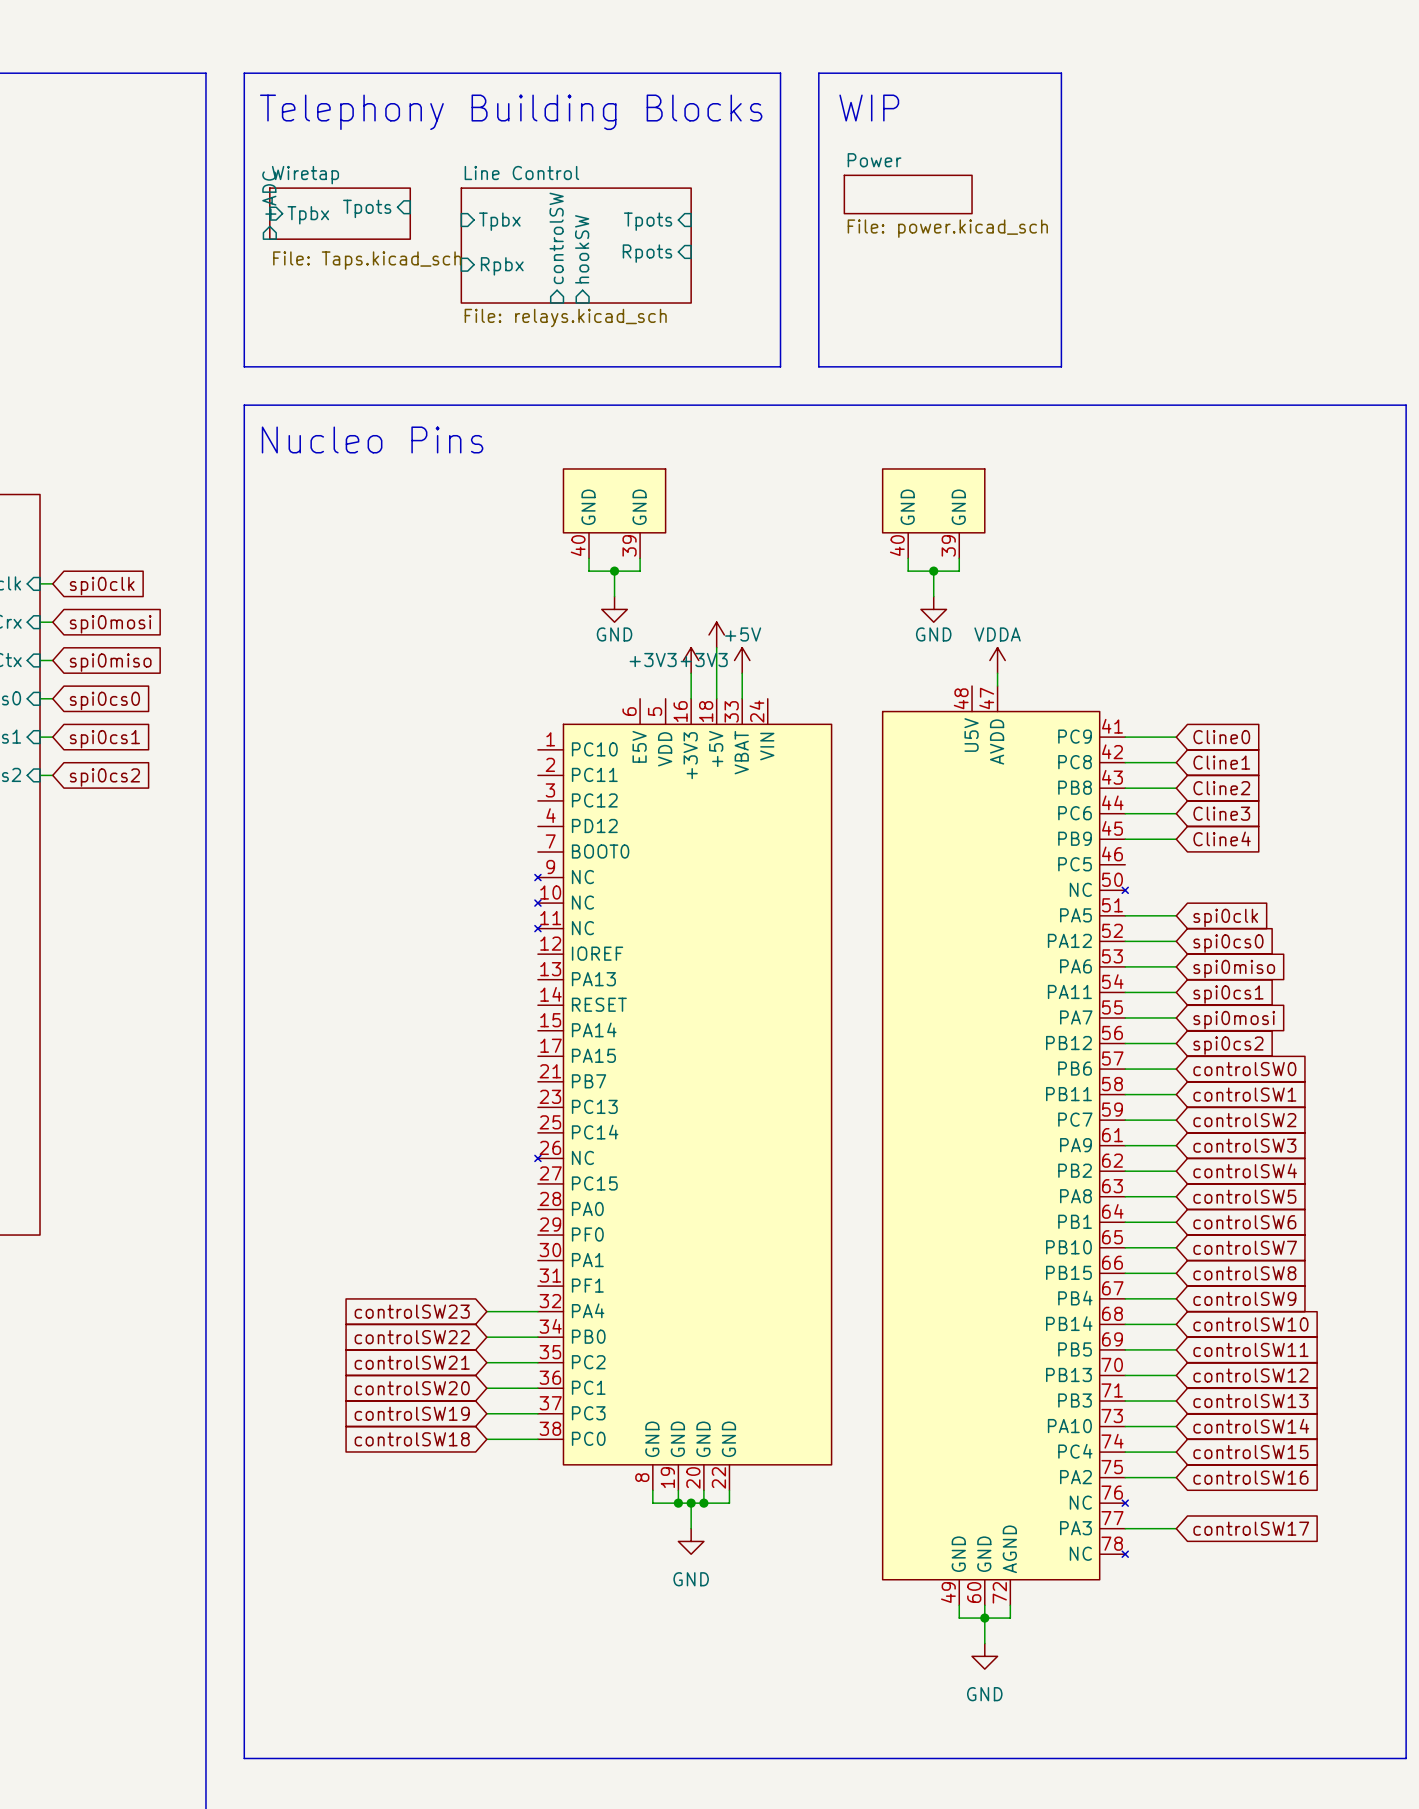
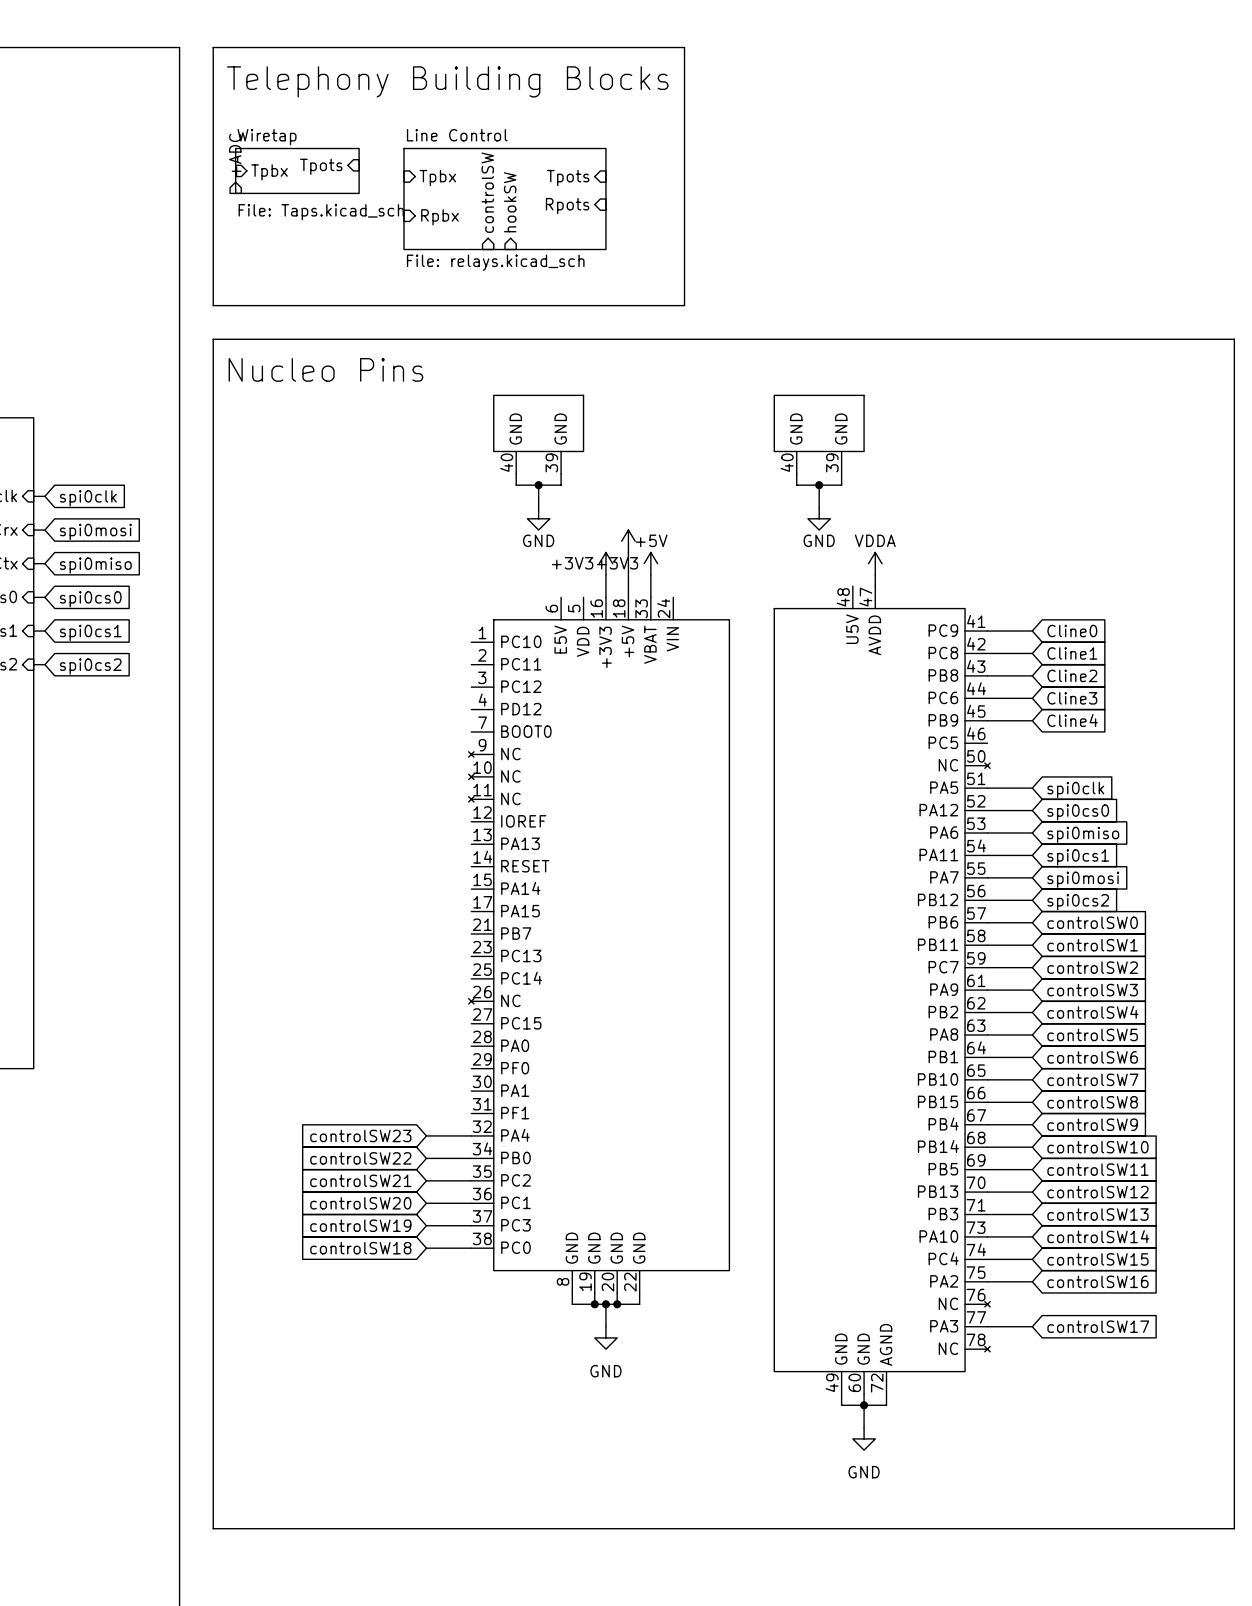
line: (818, 73) (1061, 73) (1061, 366) (818, 366) (818, 73) -> none
text: WIP (869, 108) -> none
sheet Power: File: power.kicad_sch (908, 194) -> none

